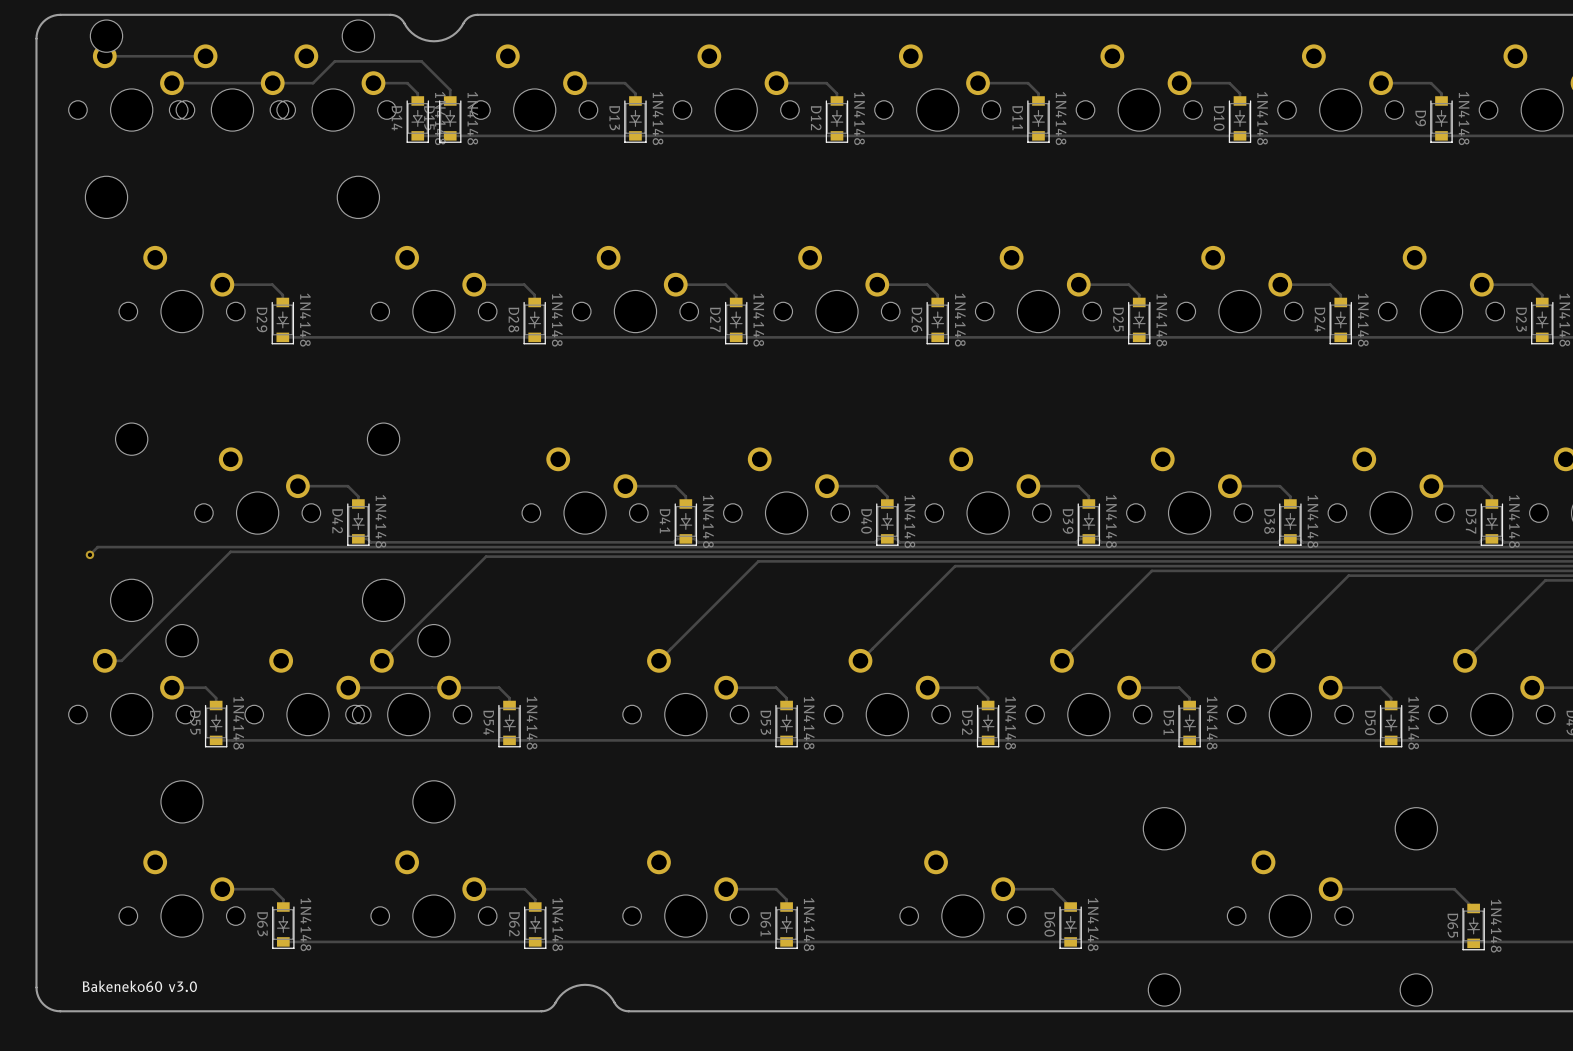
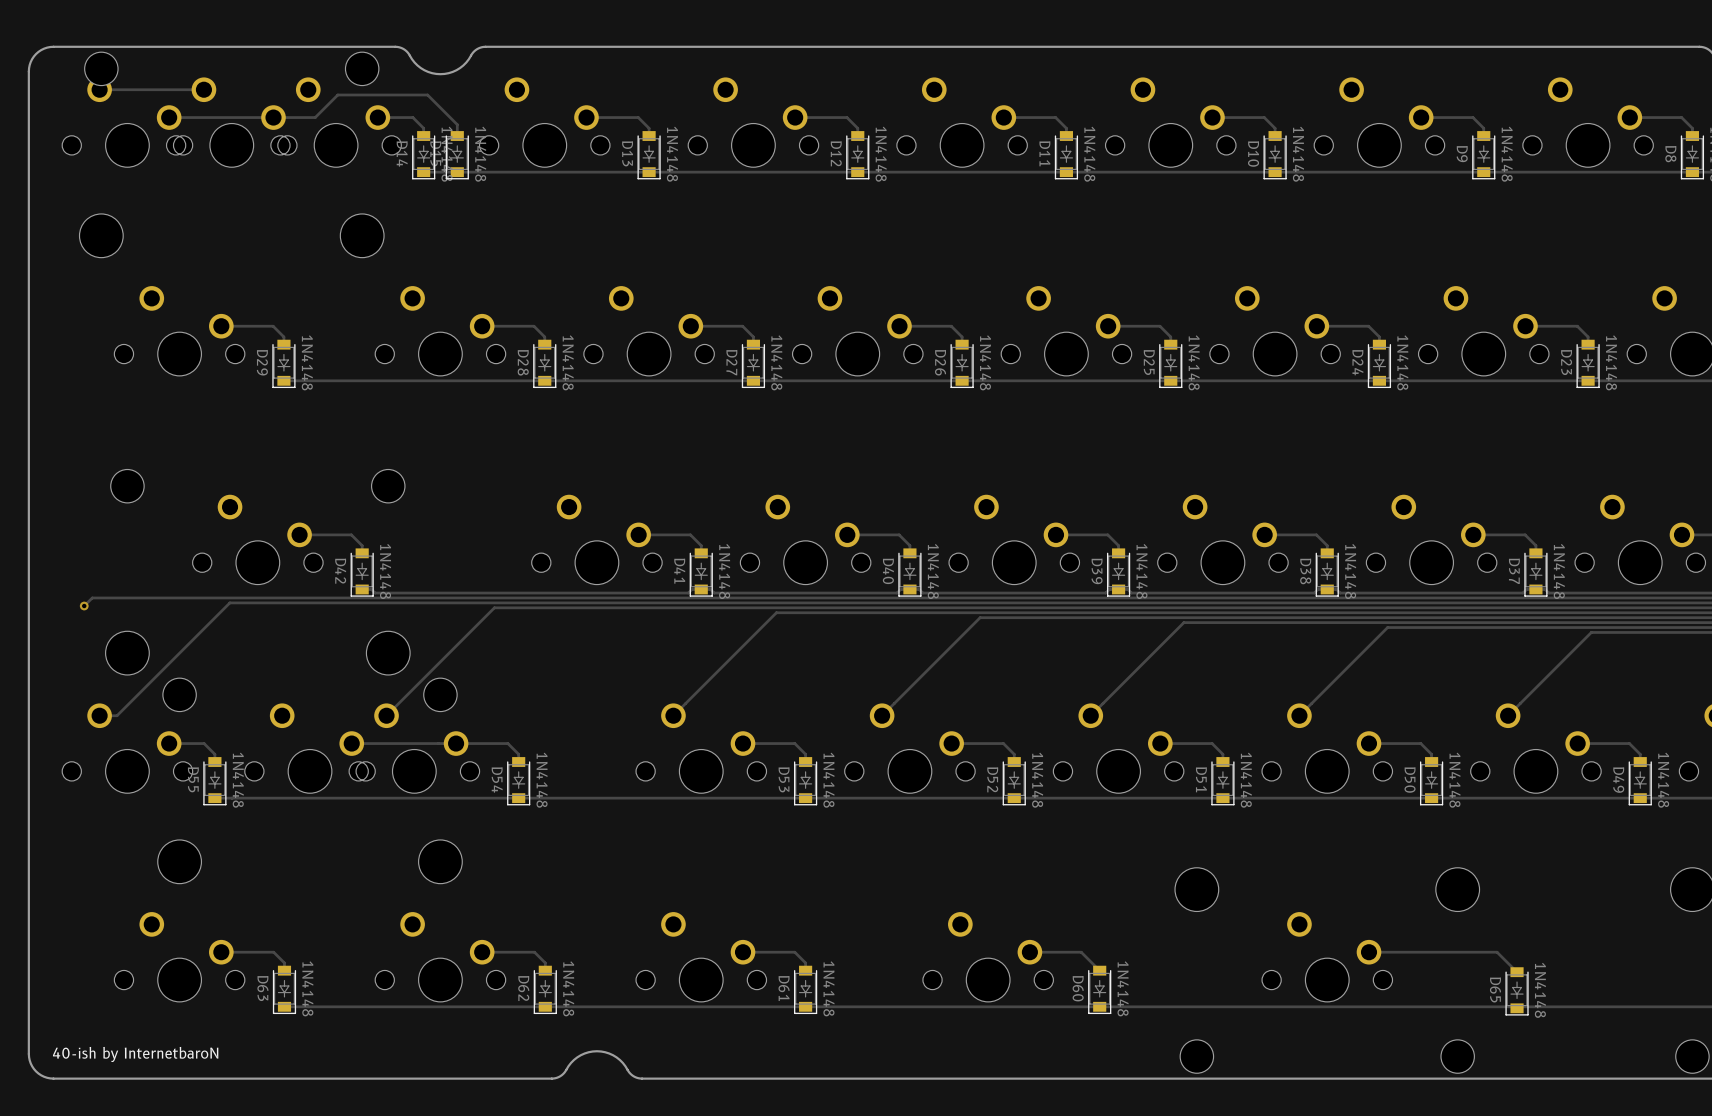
text: Bakeneko60 v3.0 (139, 986) -> 40-ish by InternetbaroN (135, 1054)

